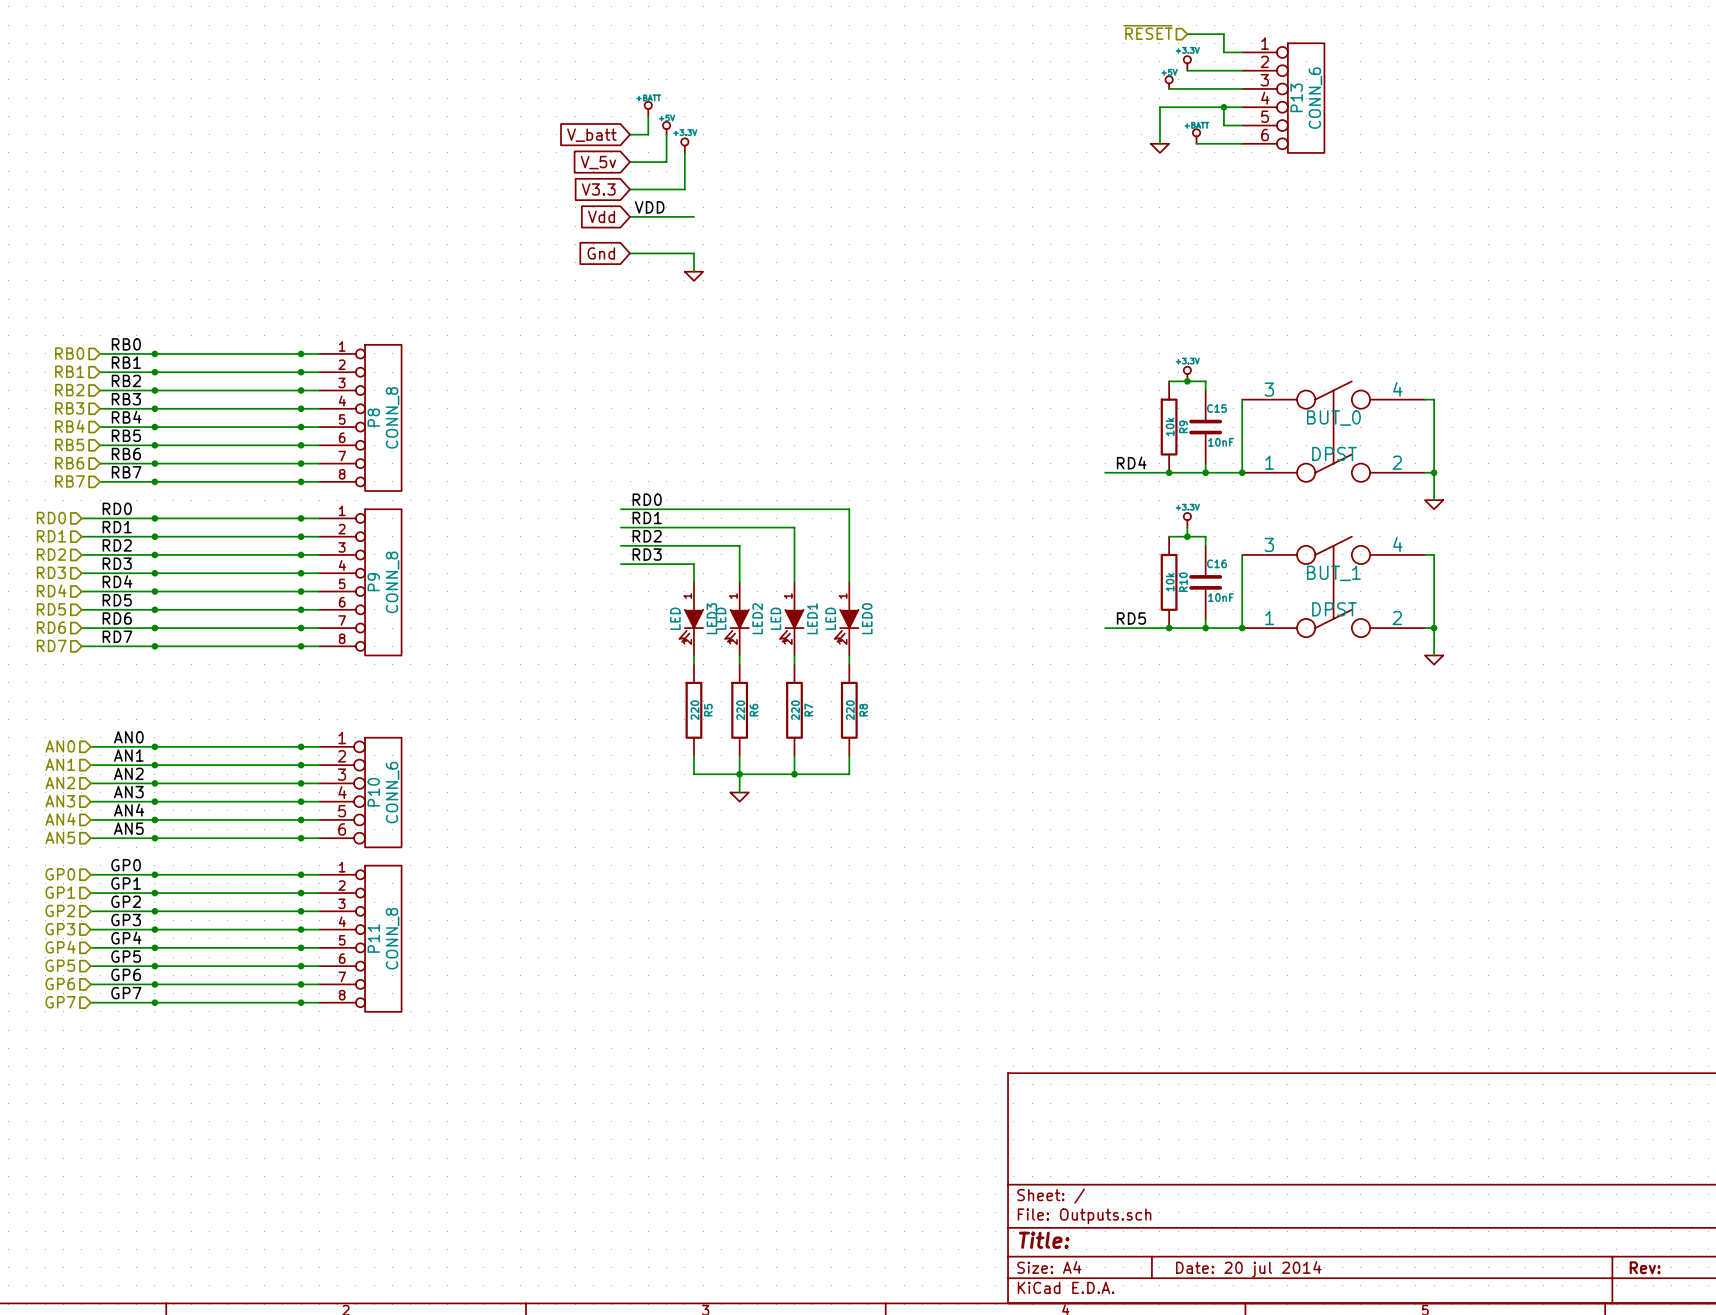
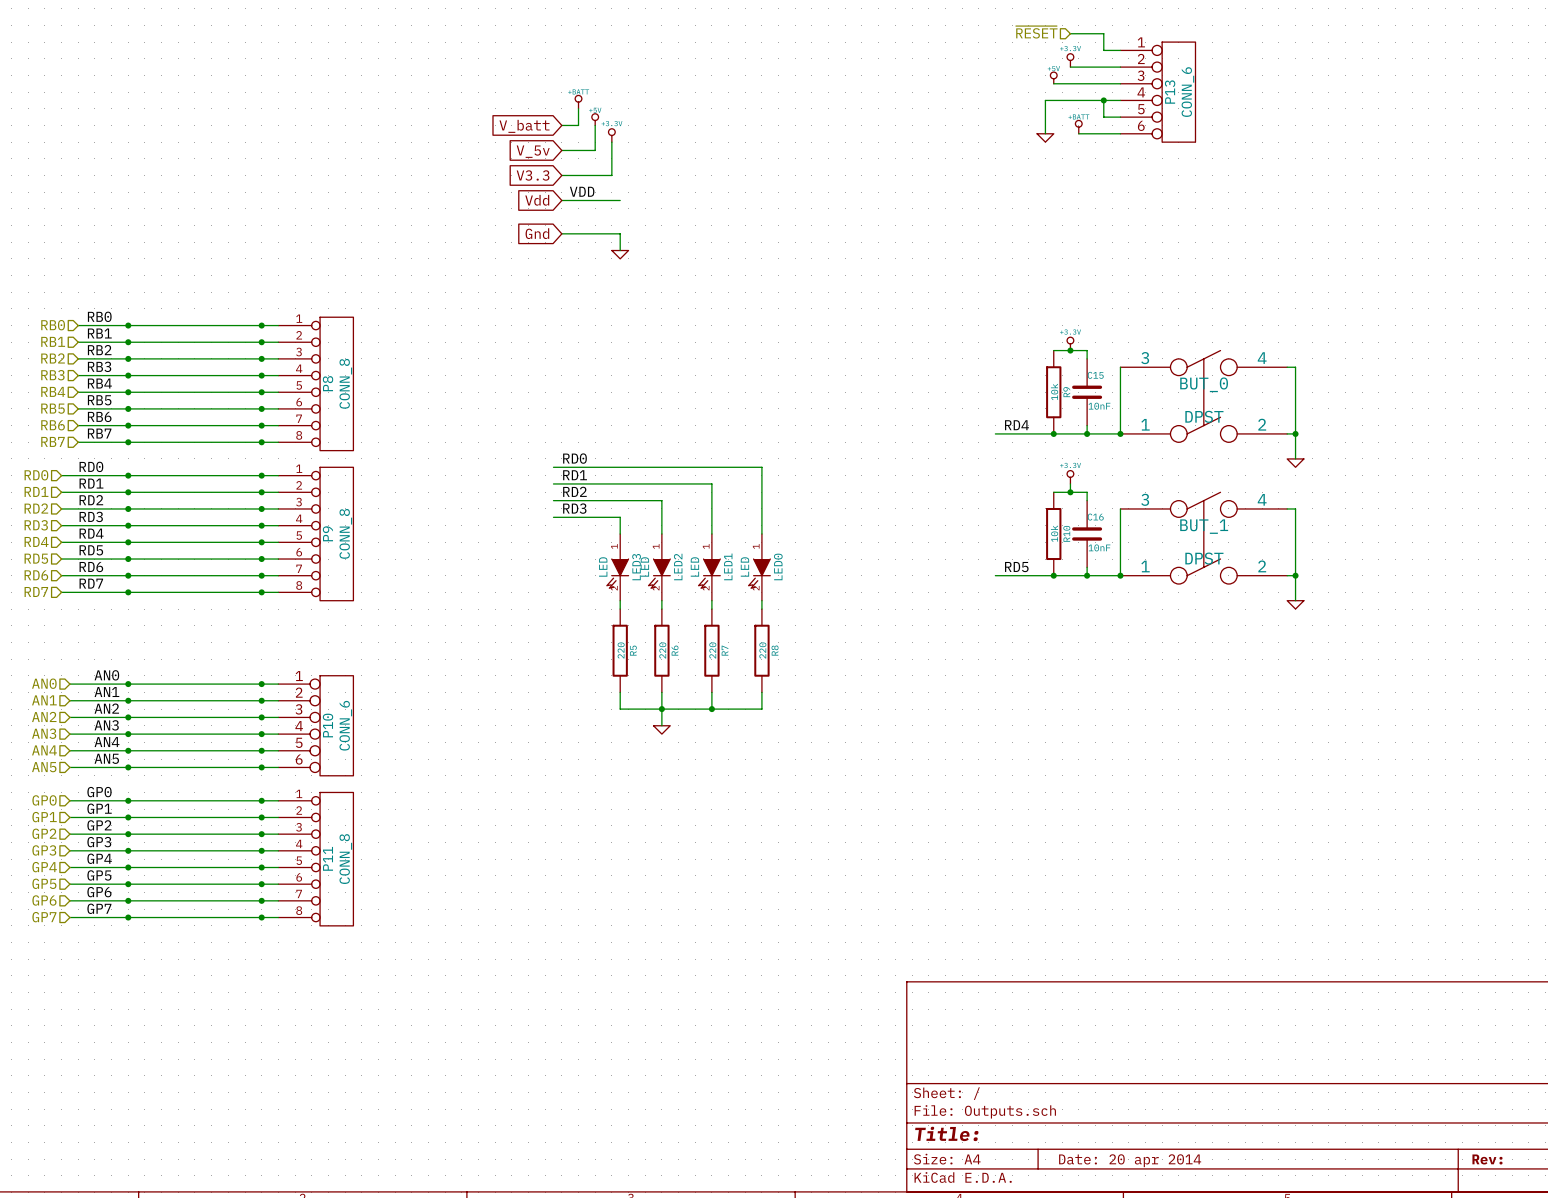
title block: Date: 20 jul 2014 (1248, 1269) -> Date: 20 apr 2014 (1130, 1160)

